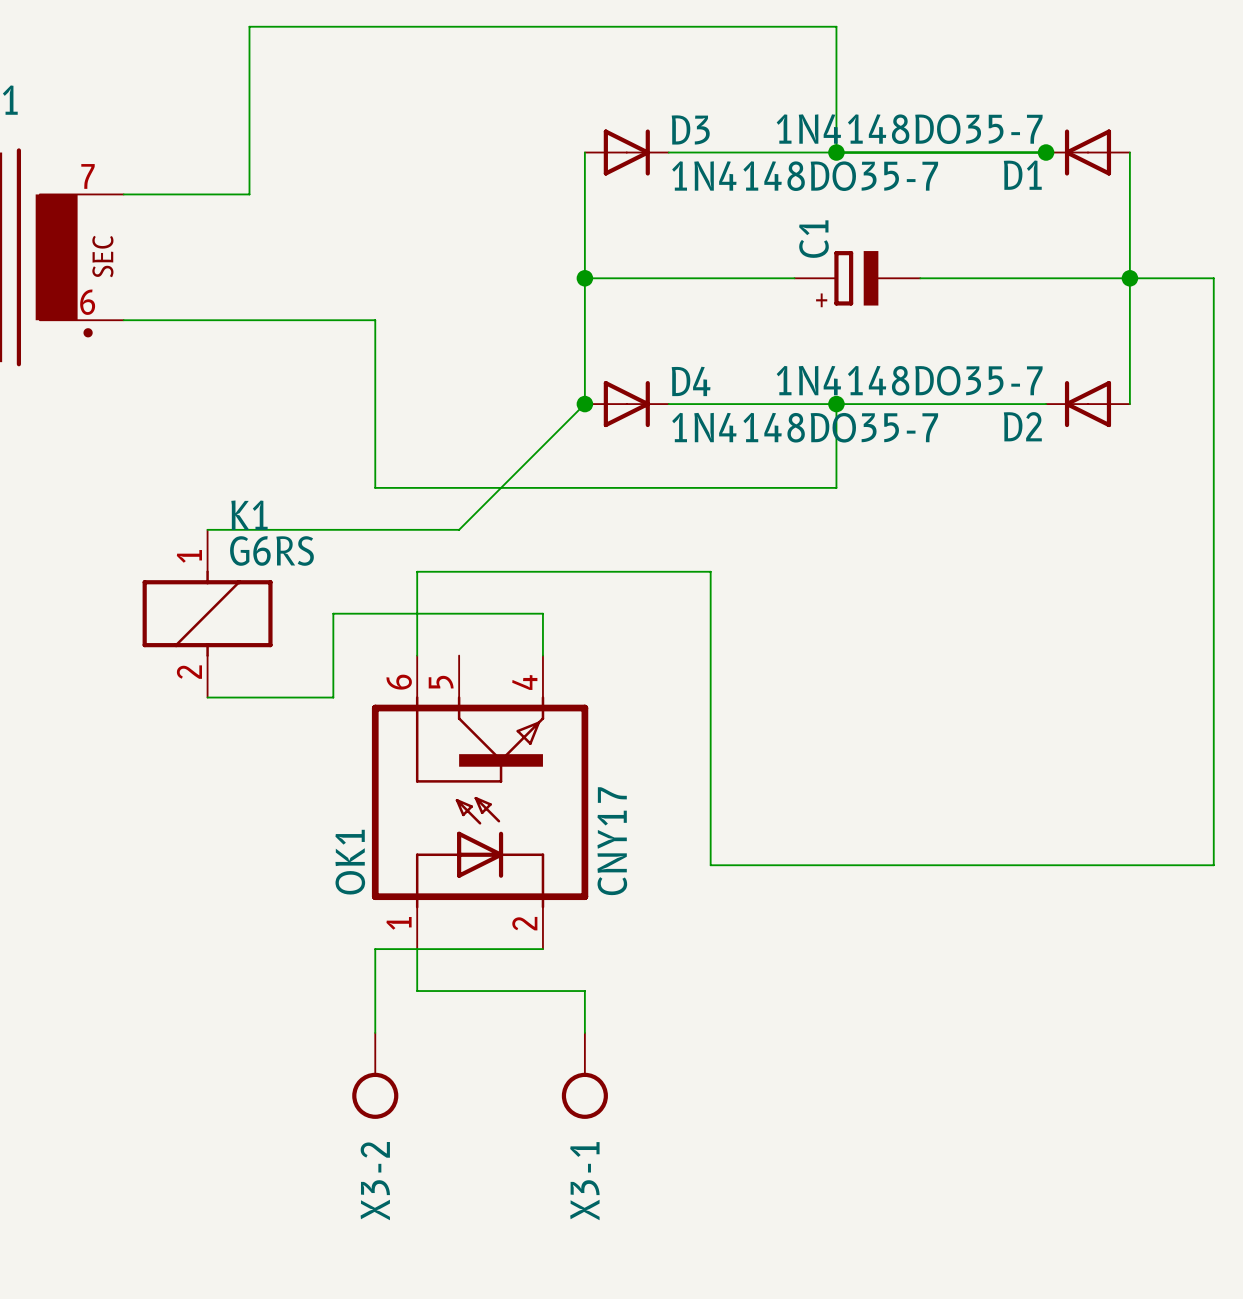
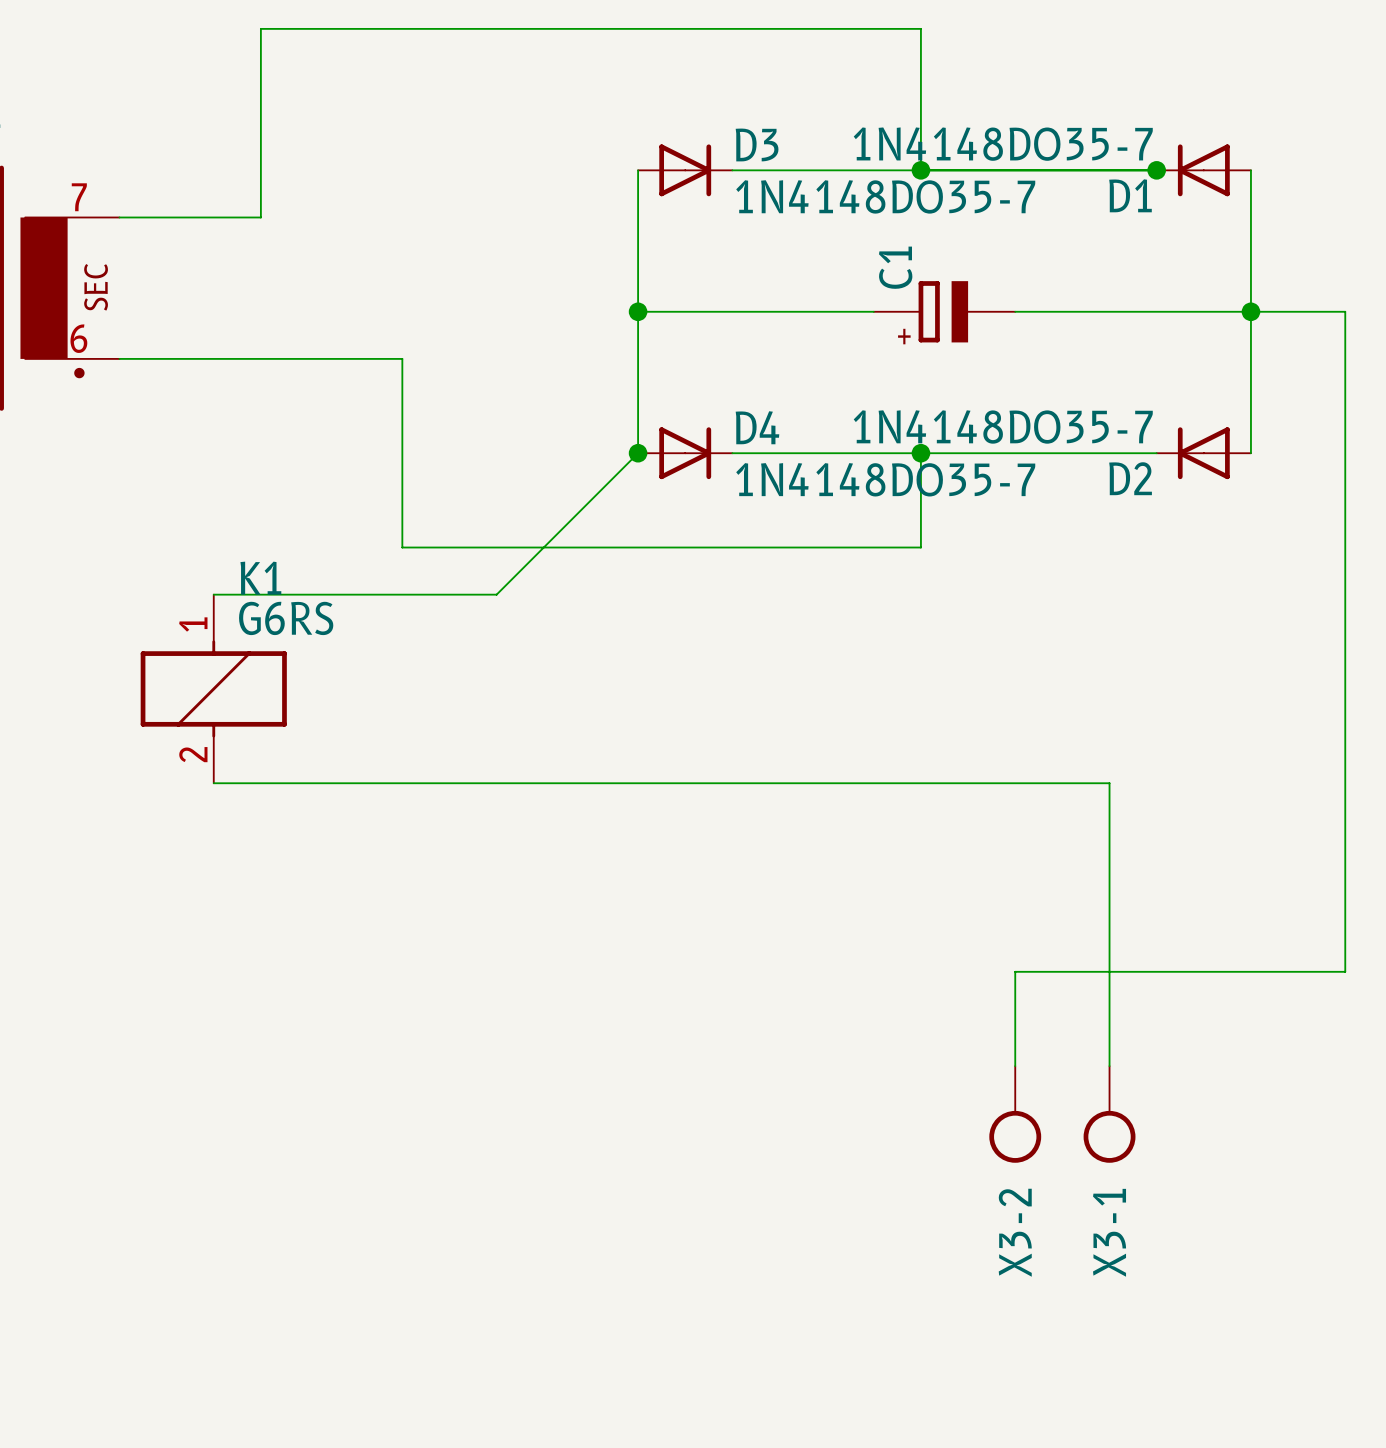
wire: (417, 655) (417, 571) (710, 571) (710, 865) (920, 865) -> (1015, 1066) (1015, 971)
wire: (542, 655) (542, 613) (333, 613) (333, 697) -> (1109, 1066) (1109, 783) (355, 783)
OK1: CNY17 (480, 802) -> none
wire: (417, 949) (417, 991) (584, 991) (584, 1032) -> none
wire: (542, 949) (375, 949) (375, 1032) -> none
X3-2 position: (375, 1075) -> (1015, 1114)
X3-1 position: (584, 1075) -> (1109, 1114)

